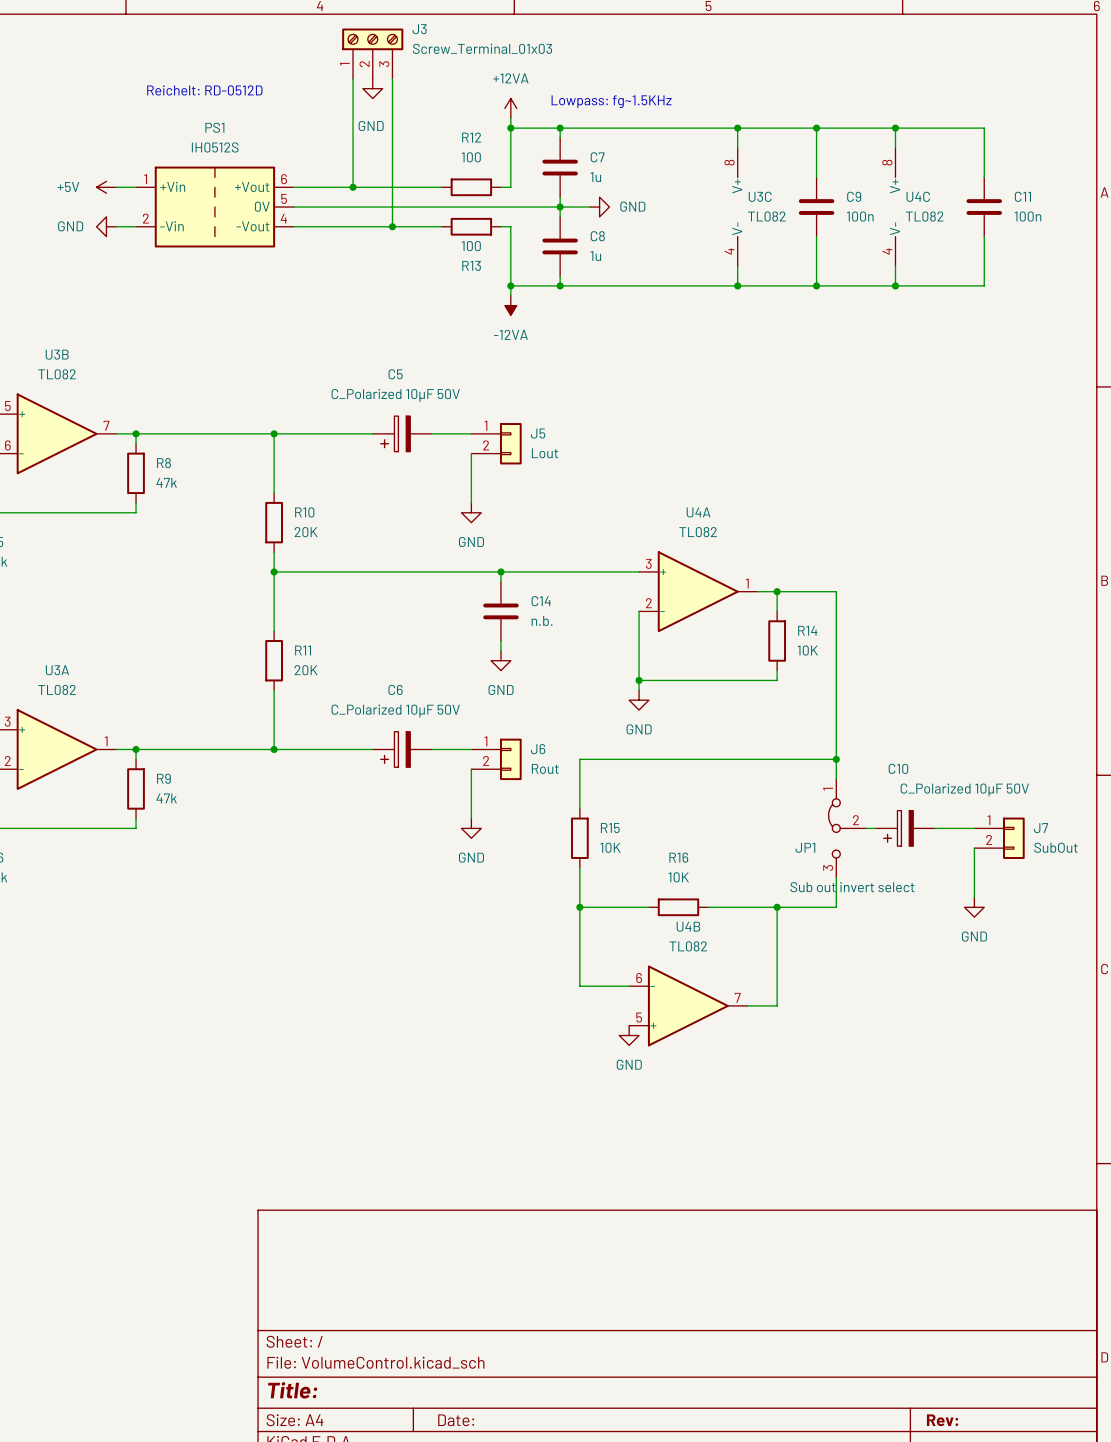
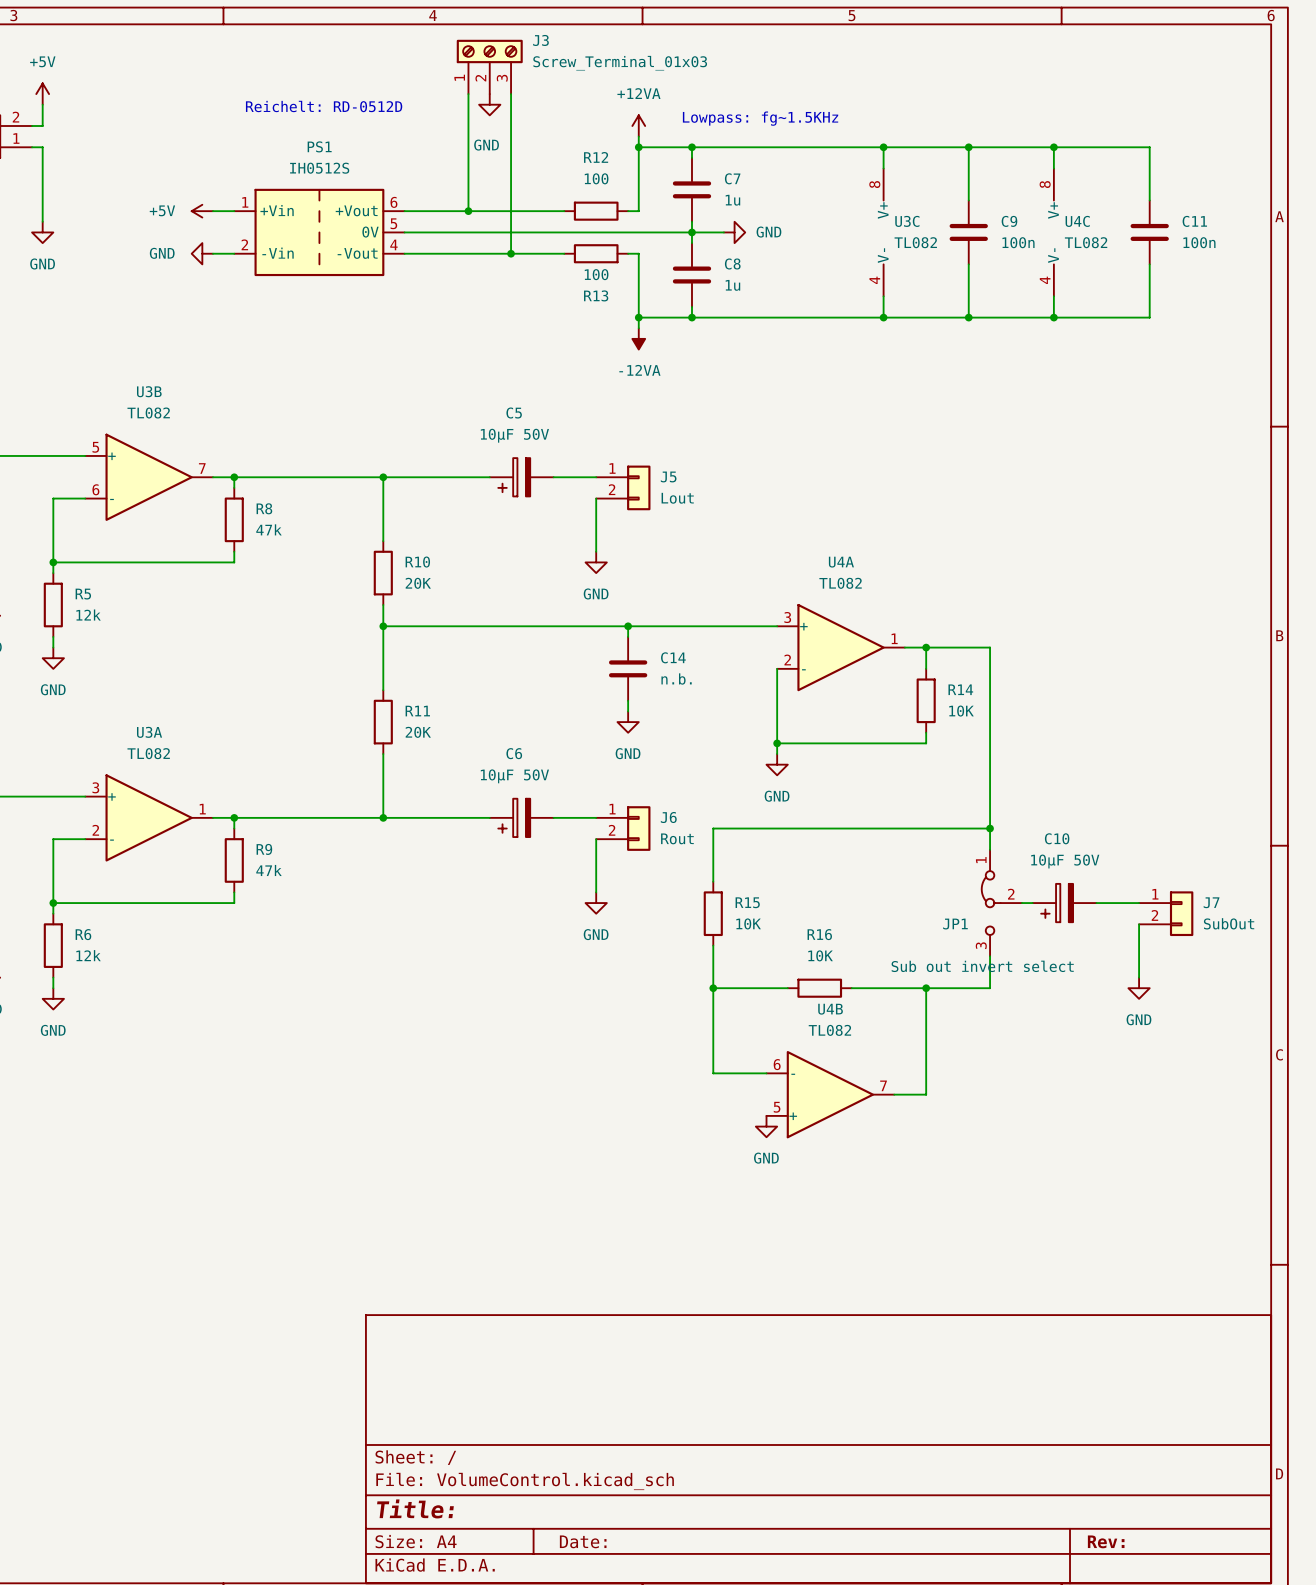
C5 value: C_Polarized 10µF 50V (395, 395) -> 10µF 50V (514, 435)
C6 value: C_Polarized 10µF 50V (395, 711) -> 10µF 50V (514, 776)
C10 value: C_Polarized 10µF 50V (964, 789) -> 10µF 50V (1065, 861)

